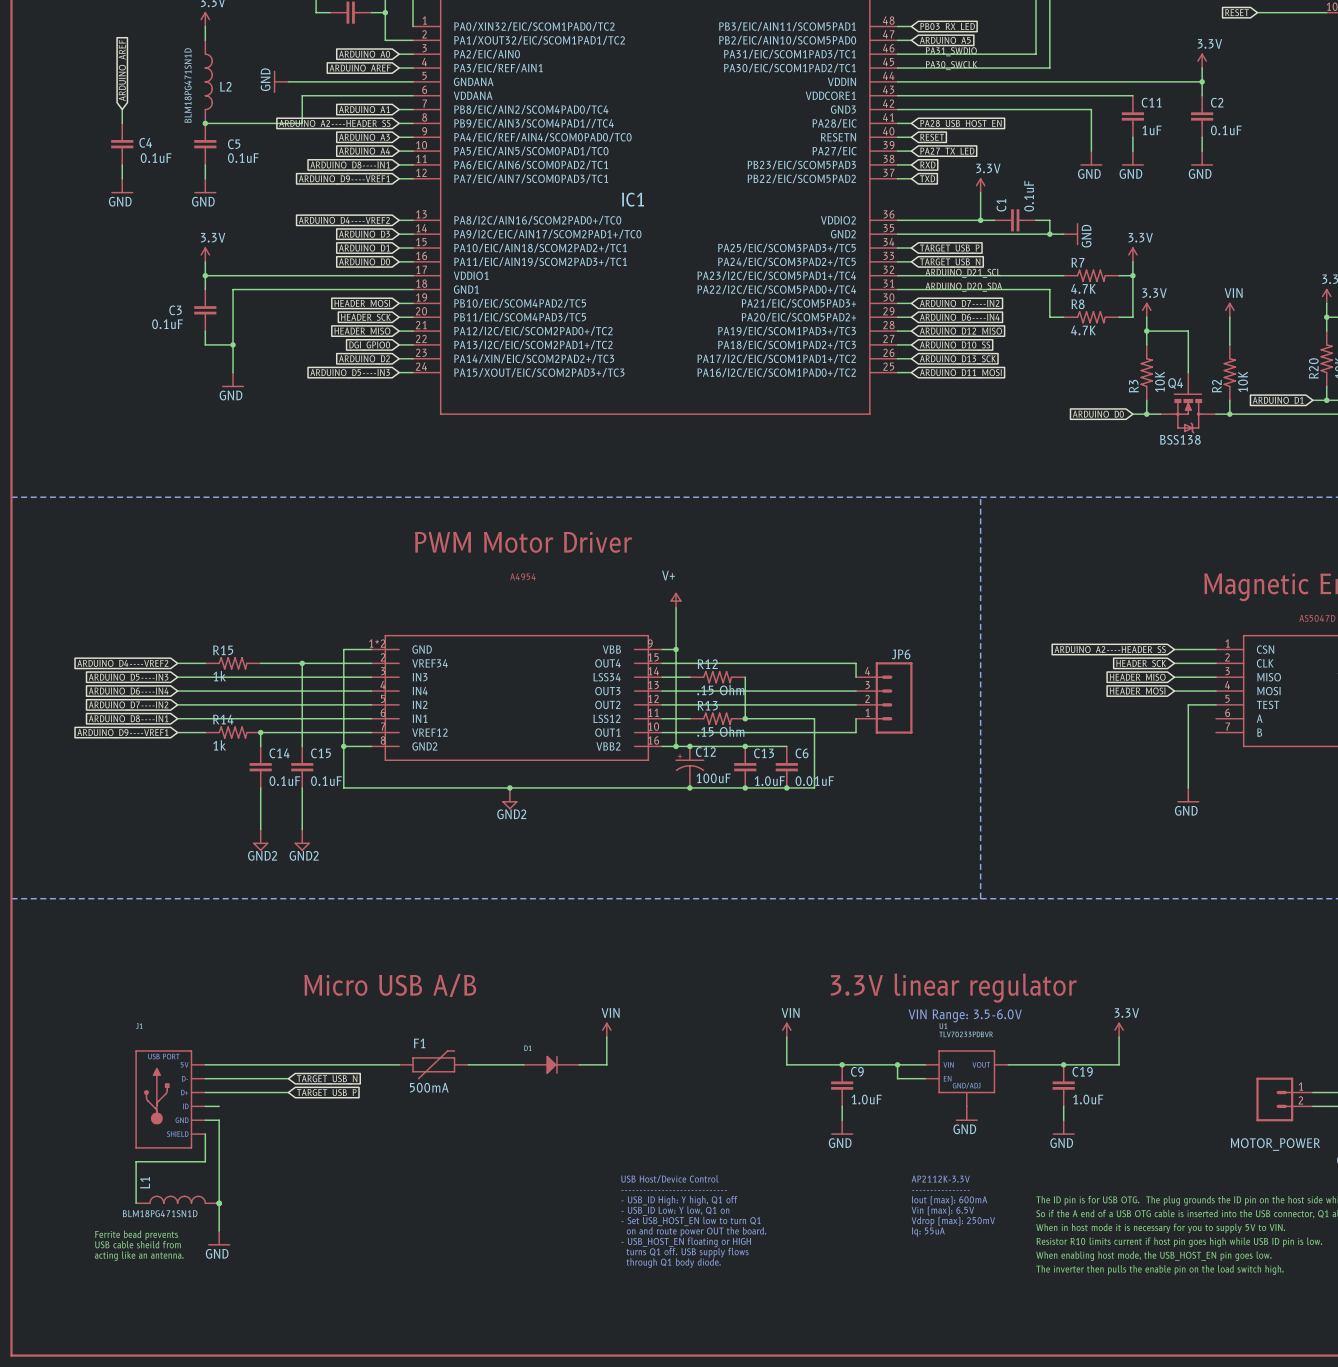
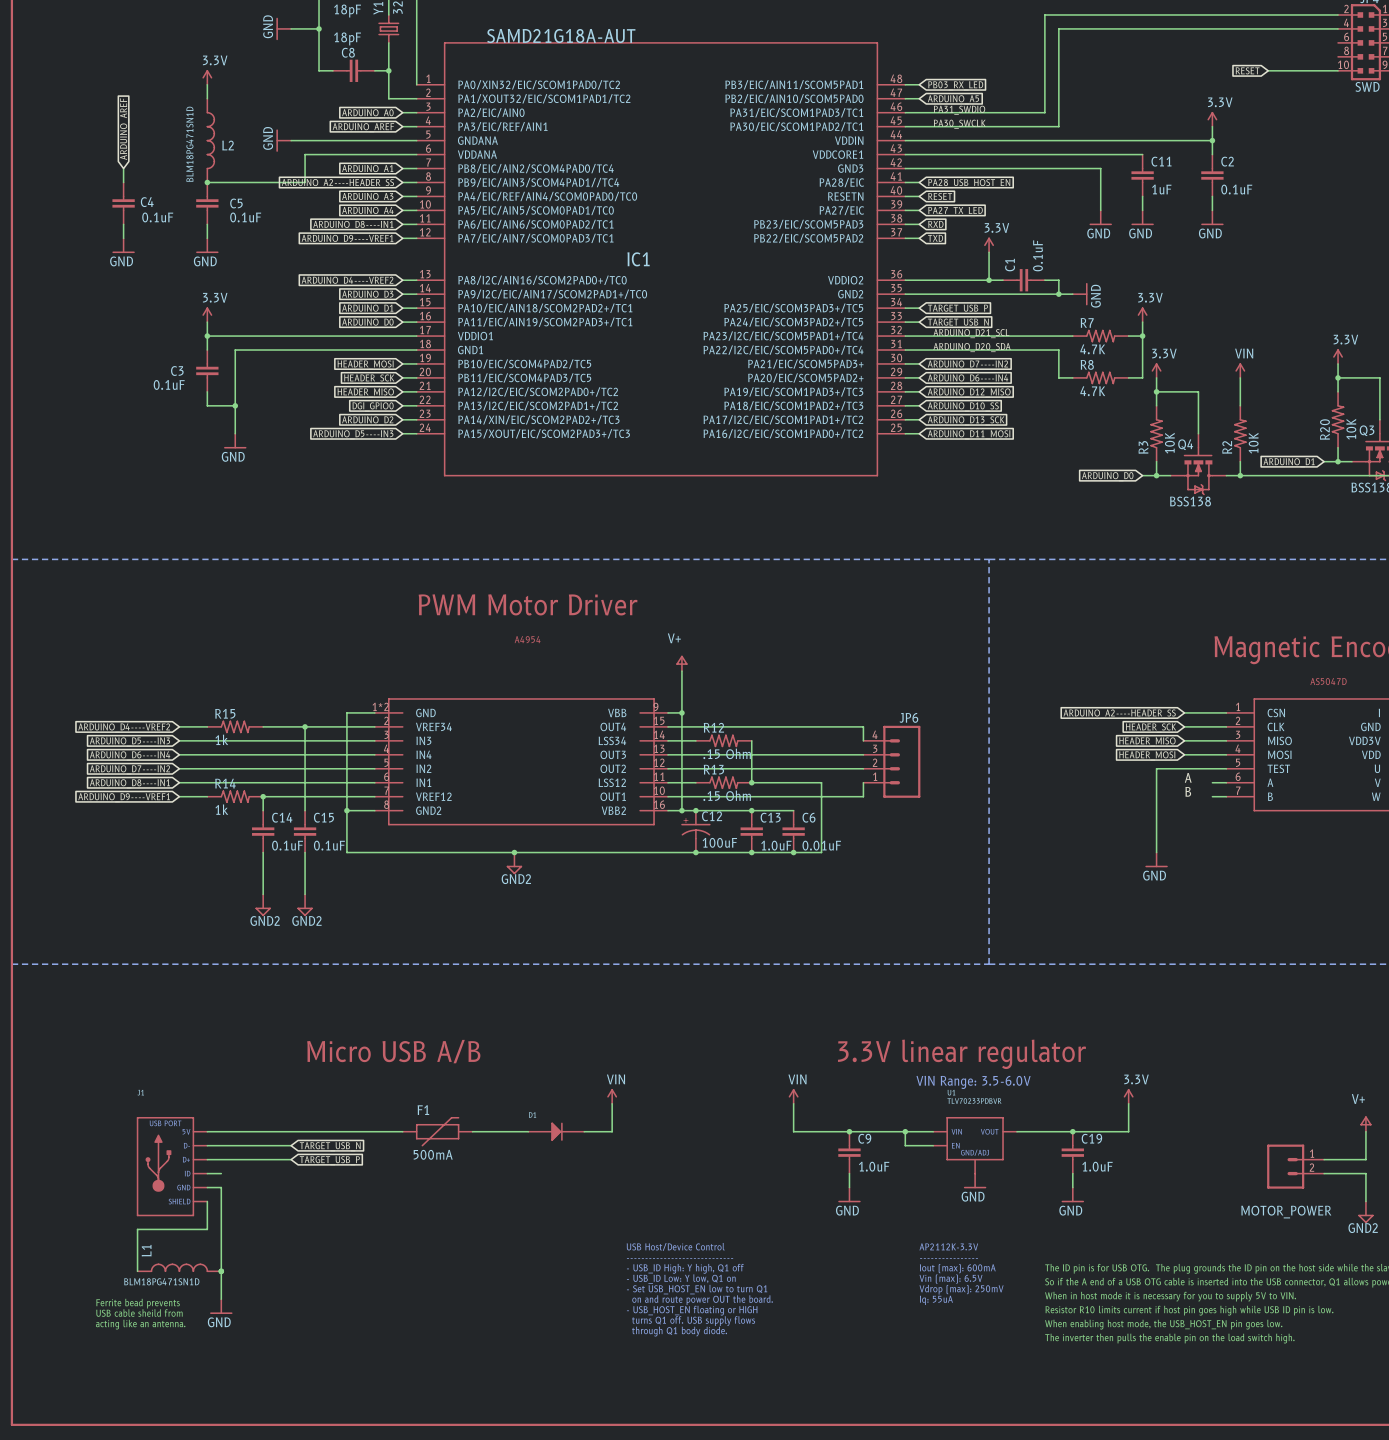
wire: (1188, 704) (1188, 787) -> (1198, 768) (1156, 768) (1156, 852)
label: none -> A (1188, 777)
wire: none -> (1212, 782) (1226, 782)
label: none -> B (1188, 791)
wire: none -> (1212, 796) (1226, 796)
power symbol position: GND (1188, 795) -> GND (1156, 859)

